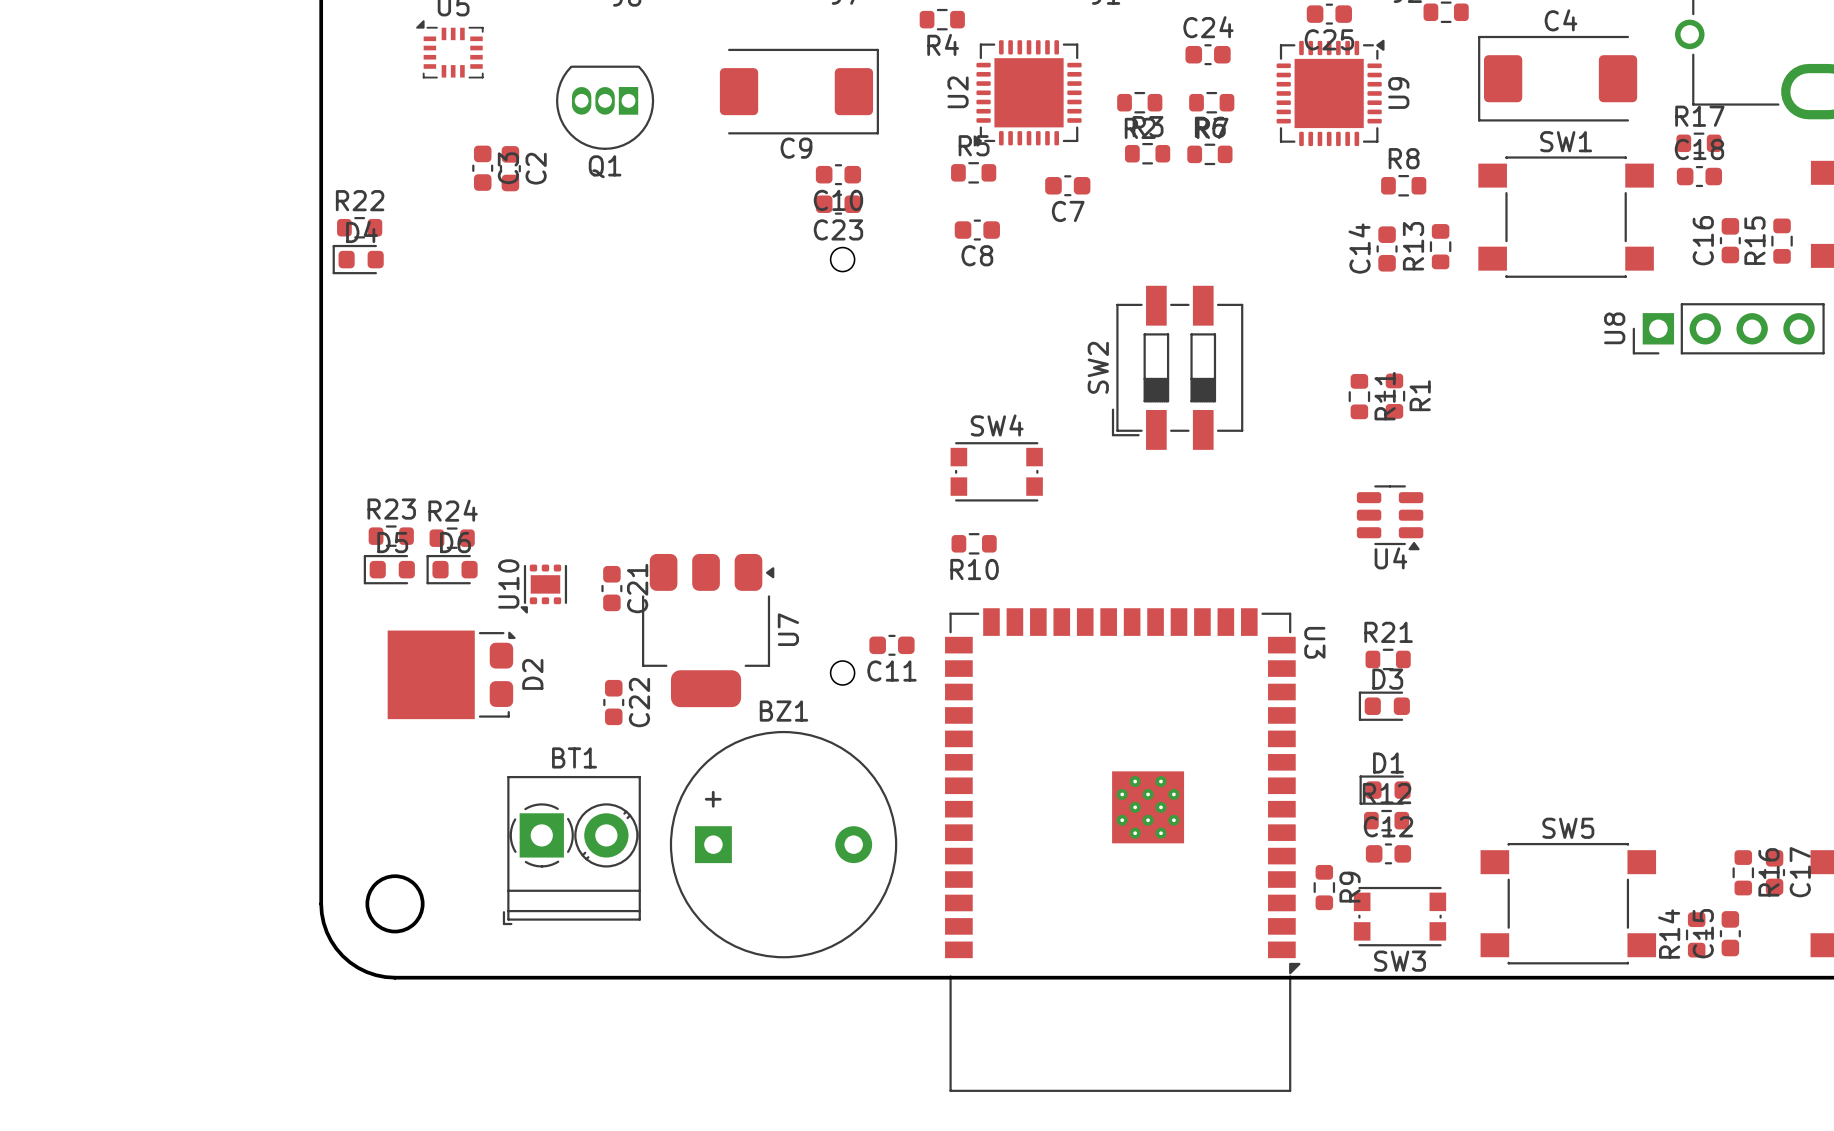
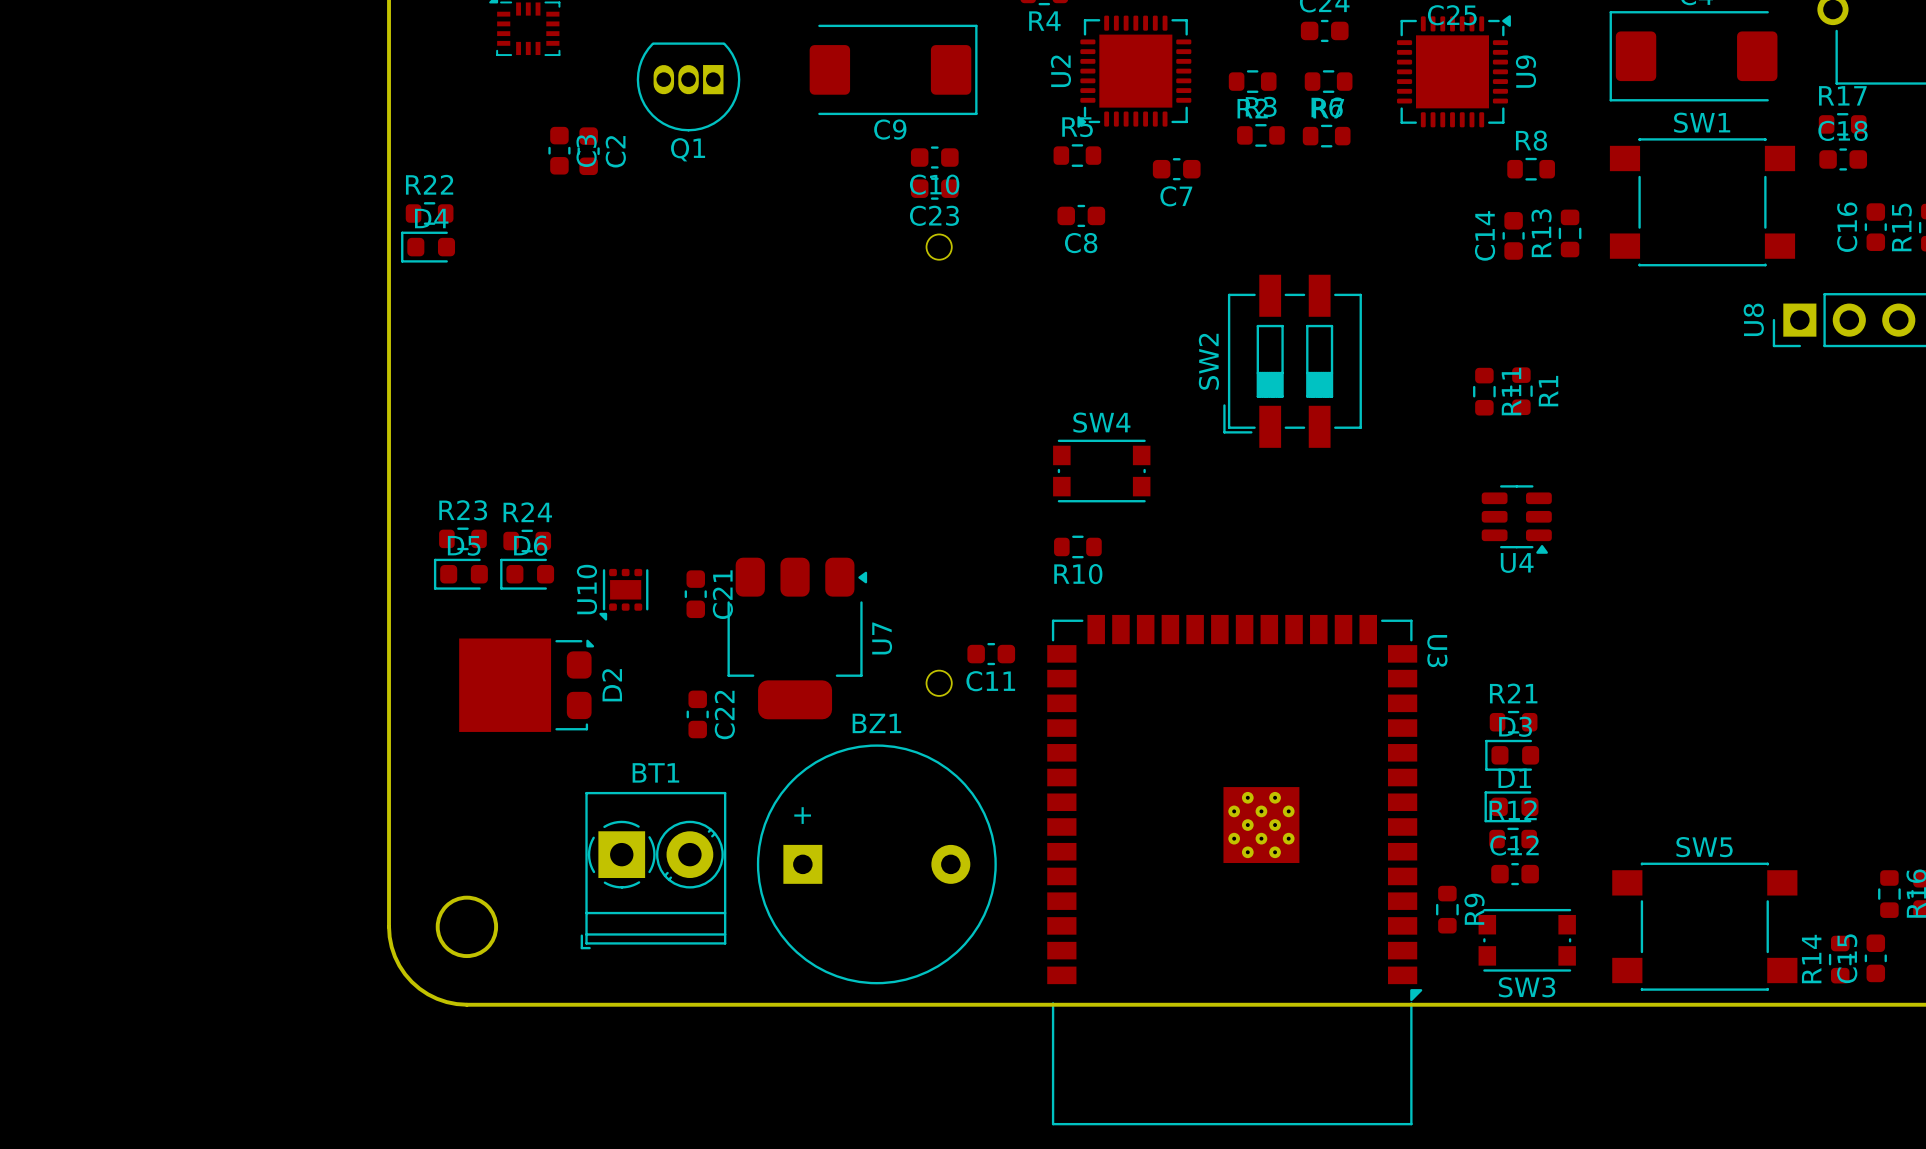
R21 position: (1388, 659) -> (1513, 722)
D3 position: (1384, 706) -> (1512, 755)

